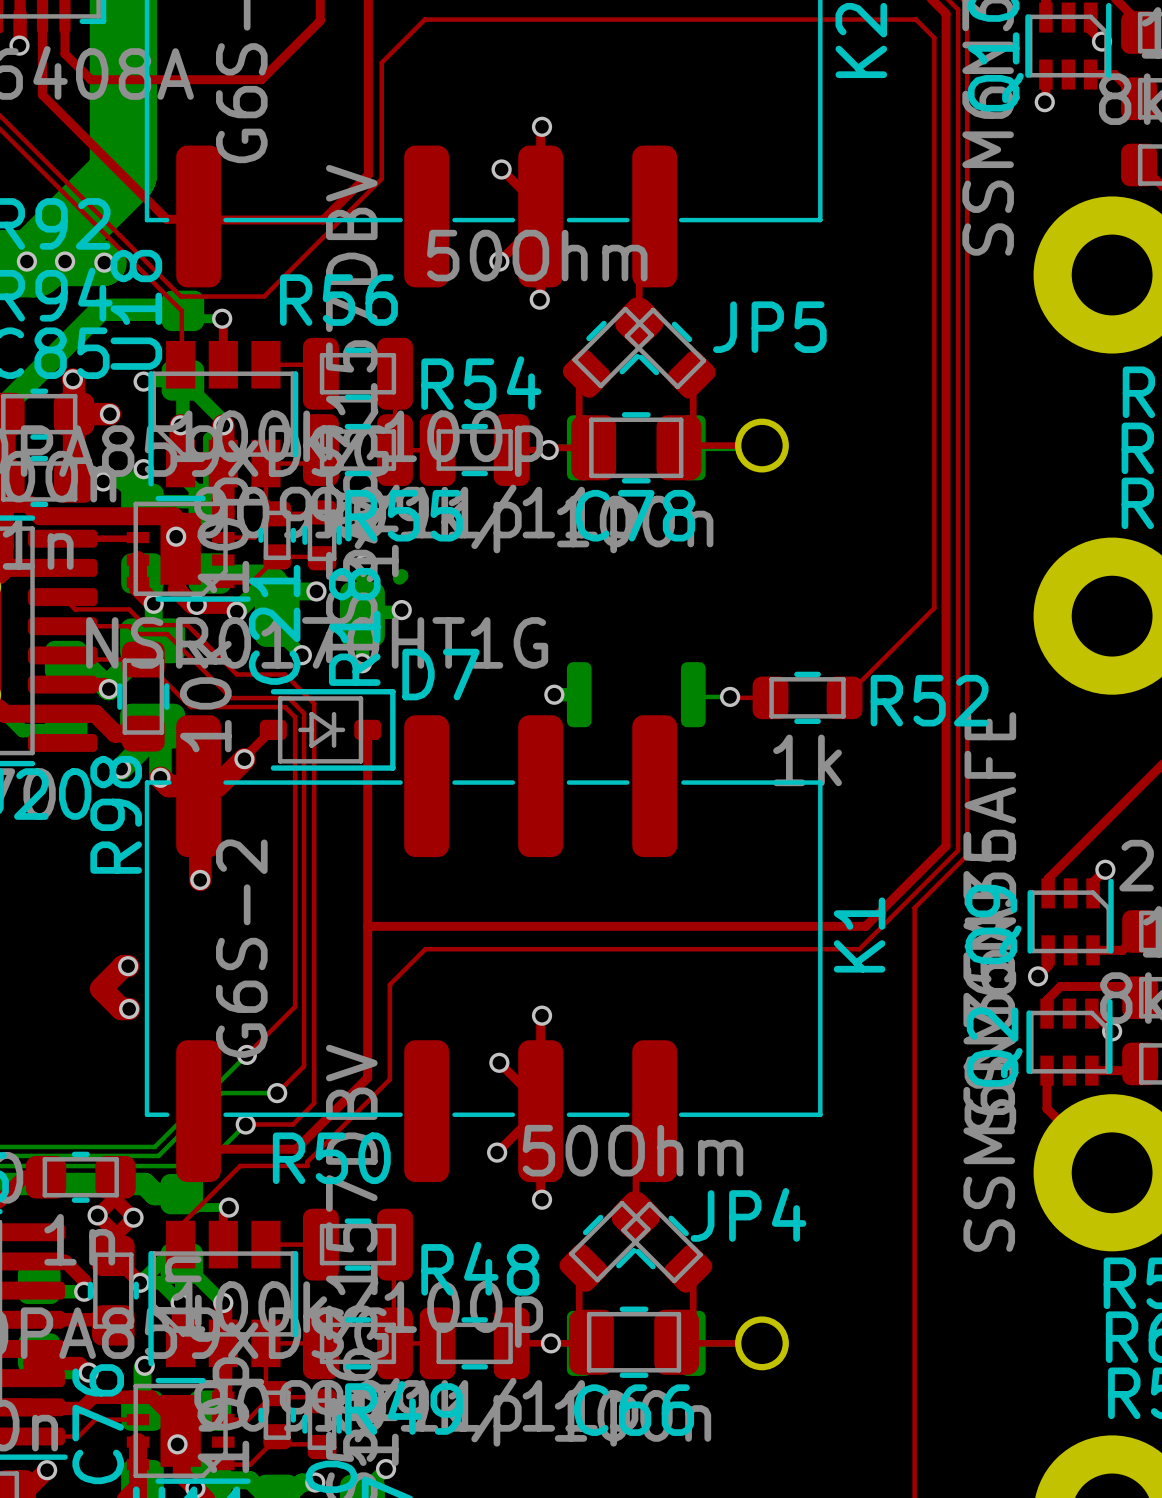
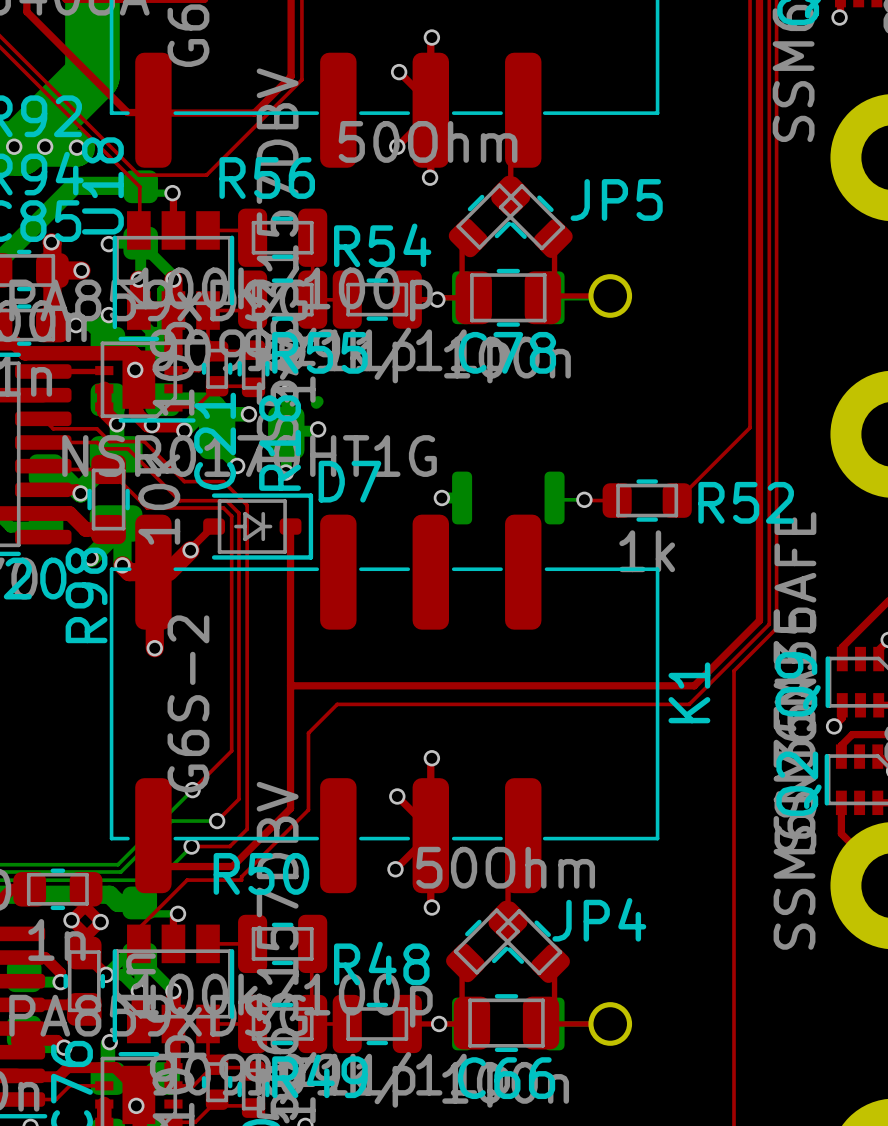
top track: (128, 966) (123, 966) (100, 988) -> none
via: (128, 966) -> none
top track: (102, 989) (121, 1008) (129, 1008) -> none
via: (129, 1008) -> none

